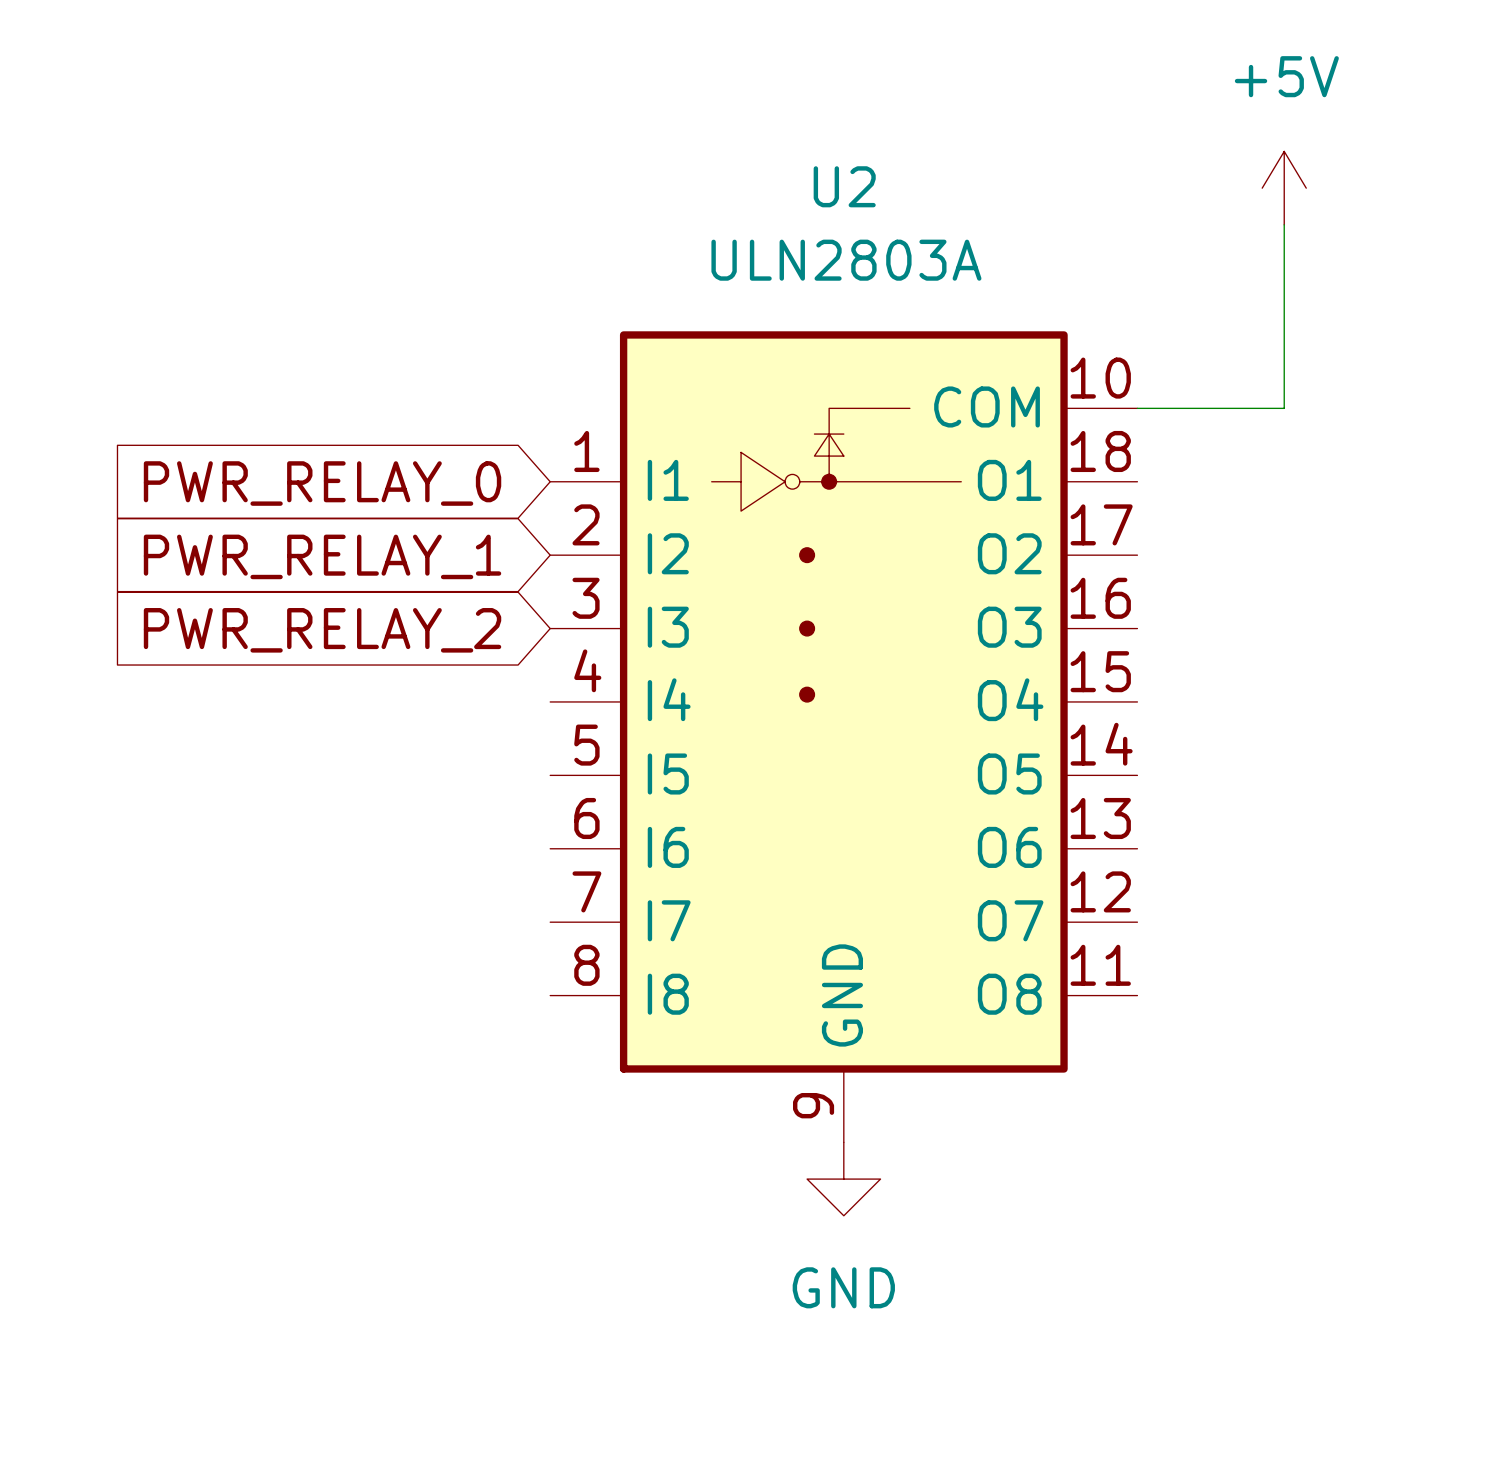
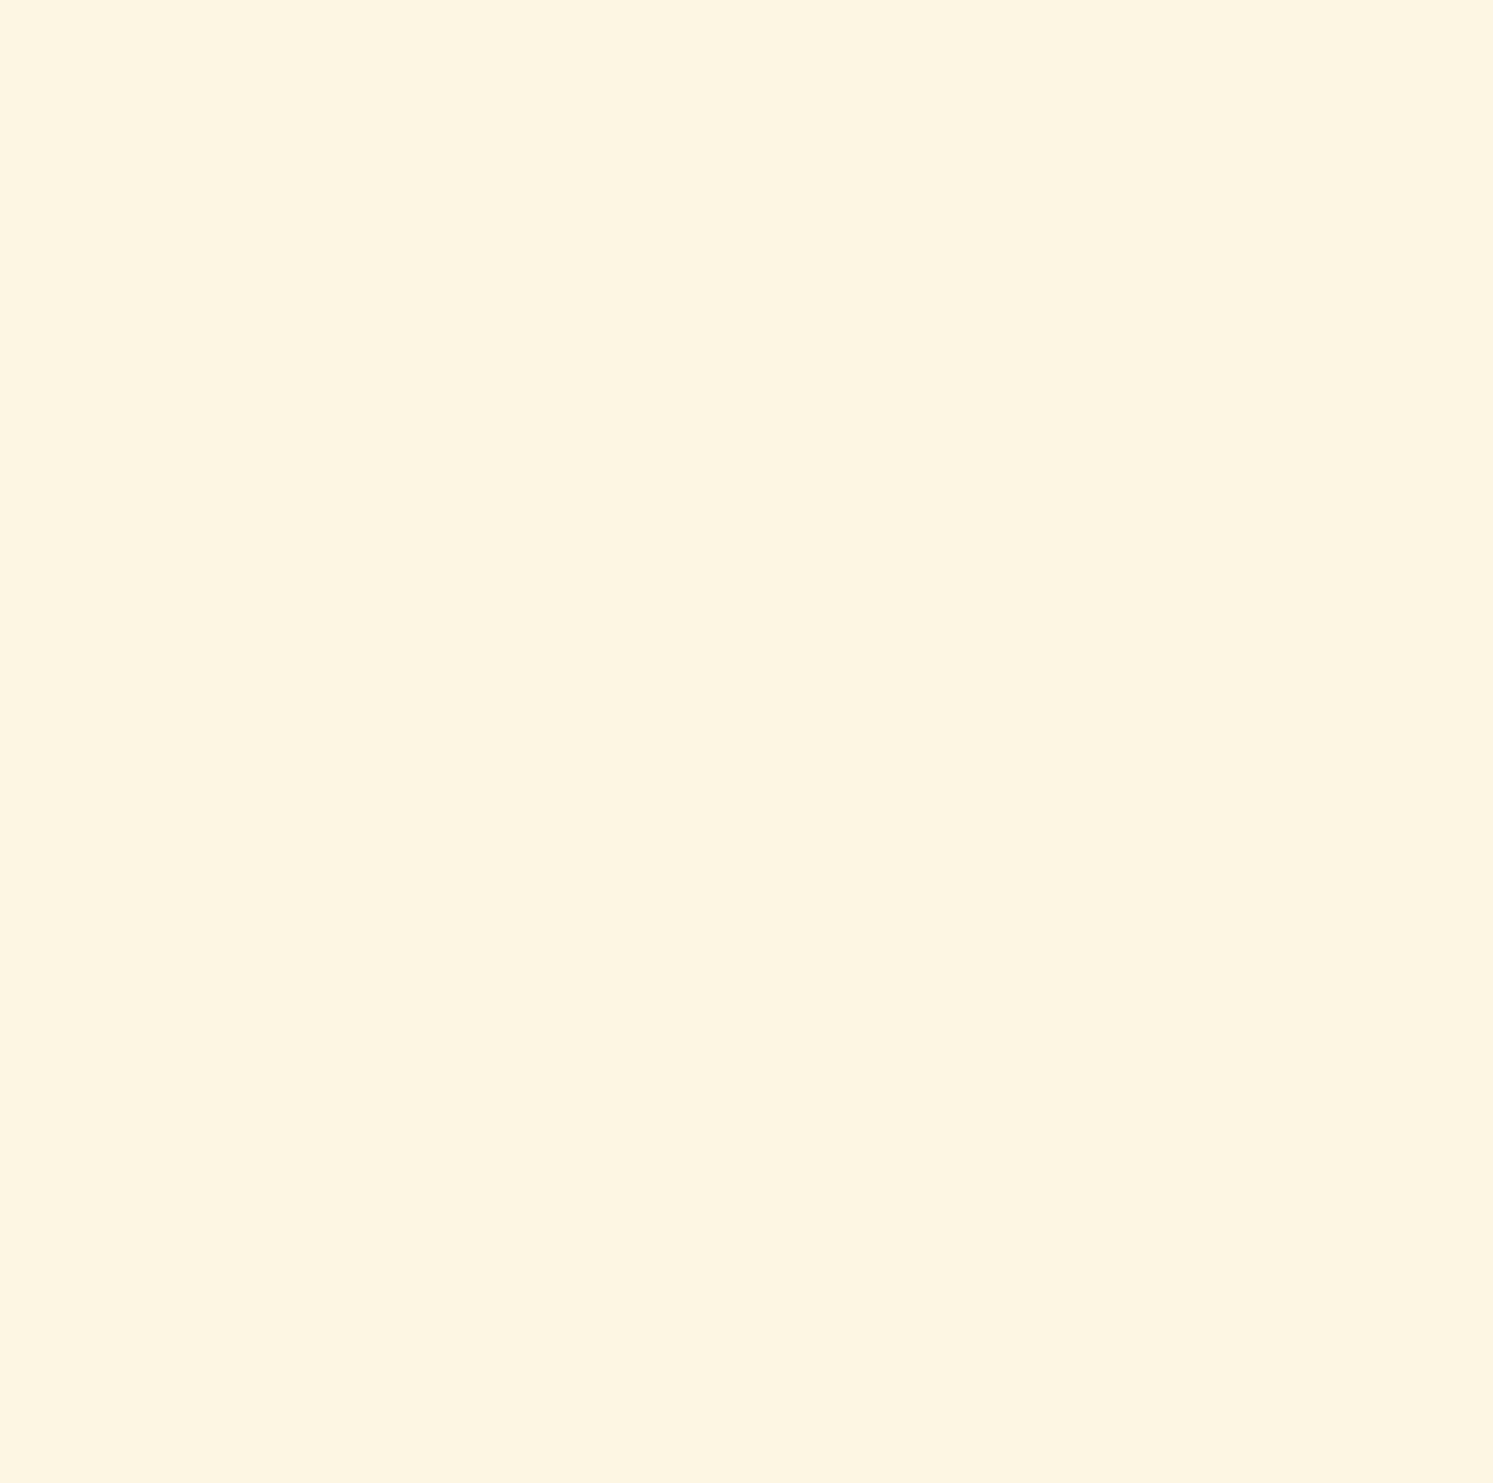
power symbol: +5V (1284, 188) -> none
wire: (1284, 224) (1284, 408) (1137, 408) -> none
global label: PWR_RELAY_0 (322, 483) -> none
global label: PWR_RELAY_1 (322, 556) -> none
global label: PWR_RELAY_2 (322, 630) -> none
U2: ULN2803A (843, 736) -> none
power symbol: GND (843, 1179) -> none

